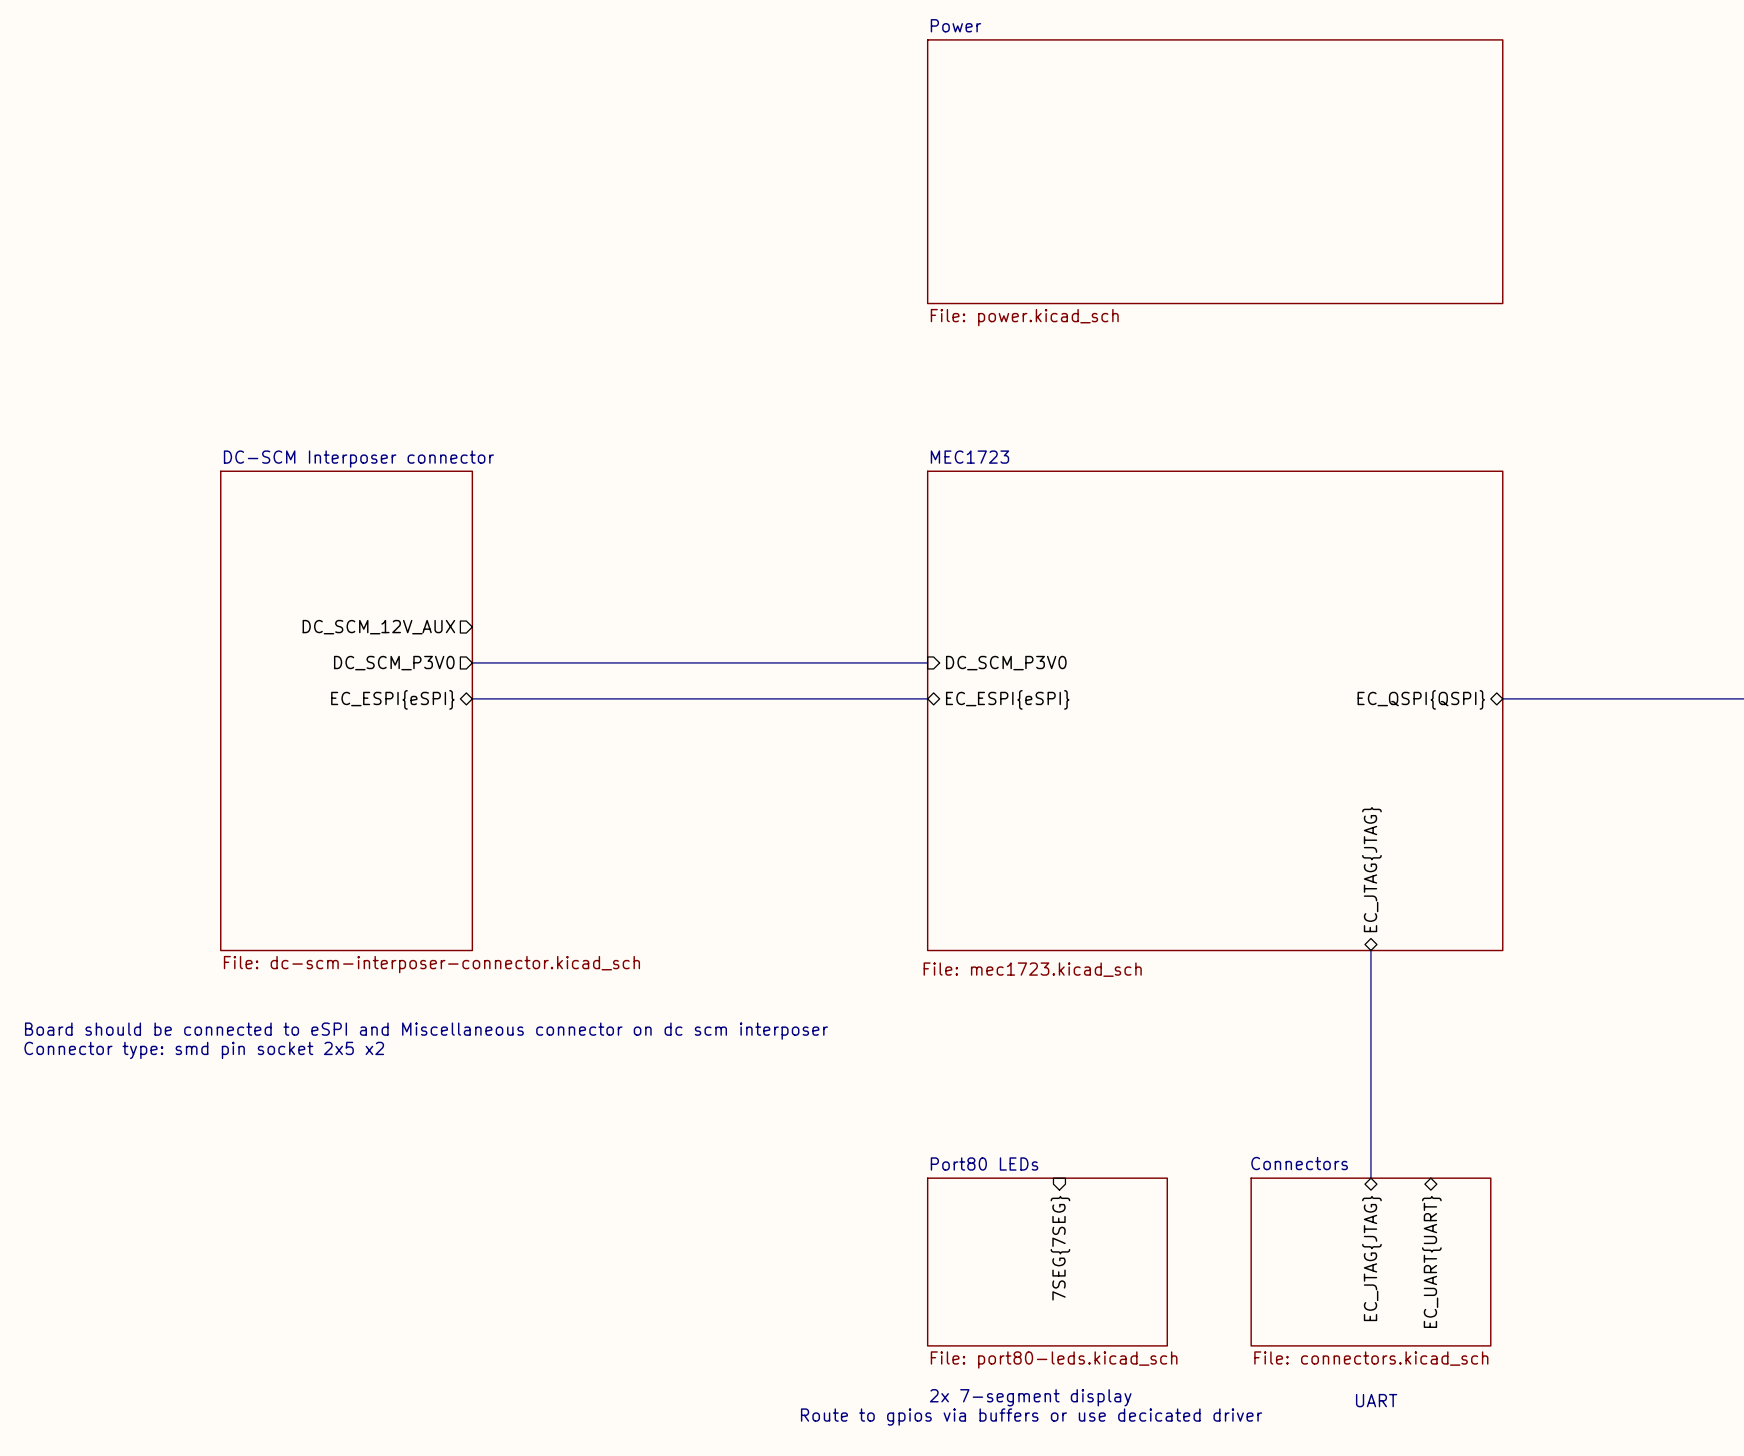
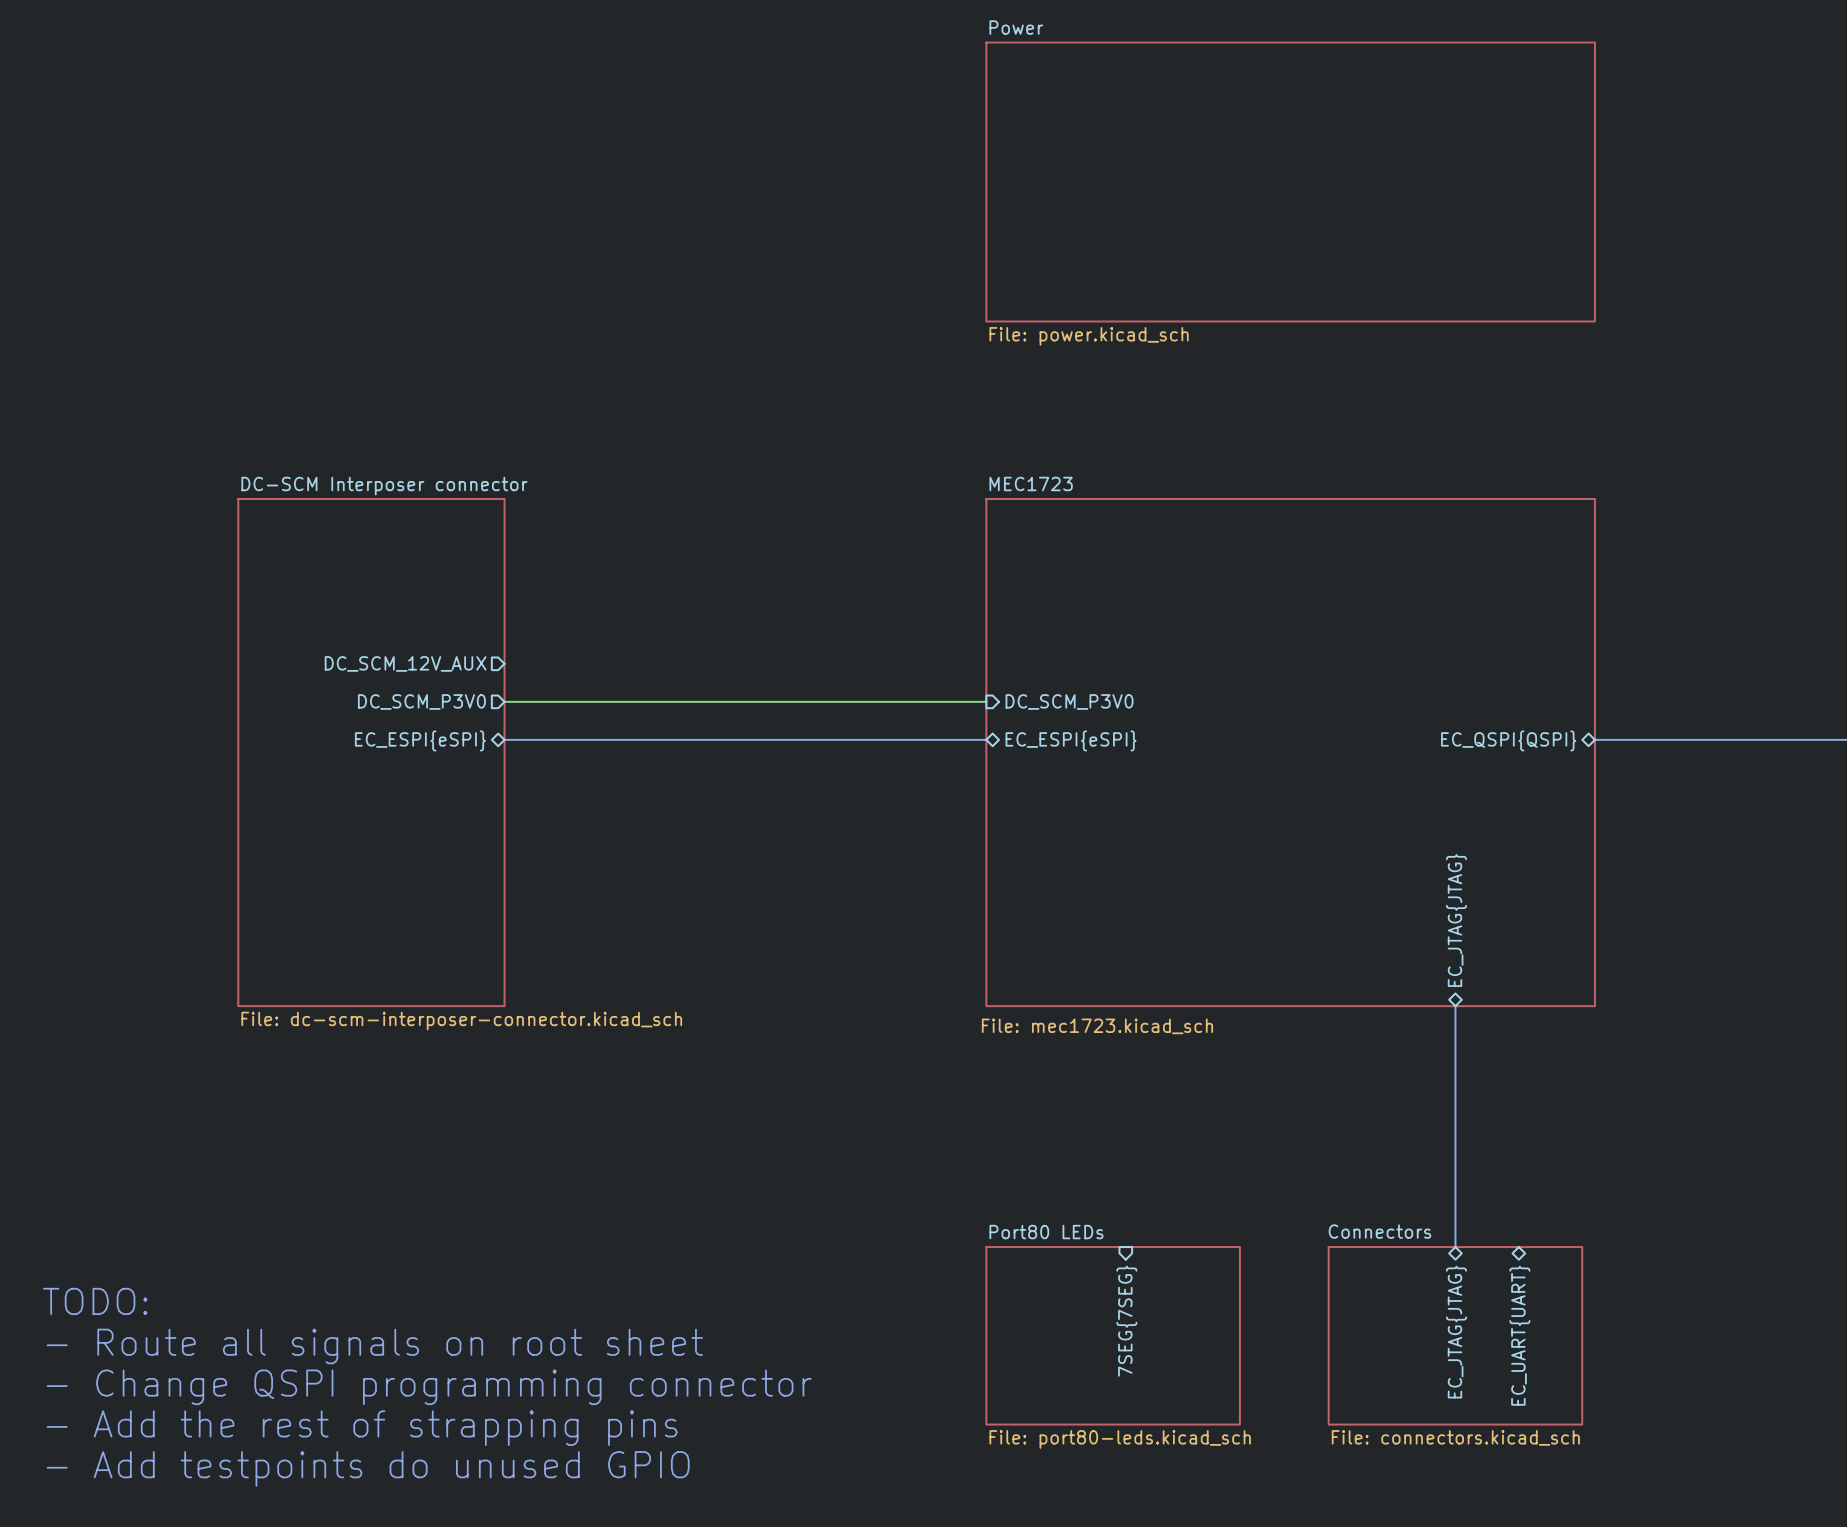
text: Board should be connected to eSPI and Miscellaneous connector on dc scm interposer (426, 1031) -> none
text: Connector type: smd pin socket 2x5 x2 (204, 1050) -> none
text: none -> TODO: (95, 1301)
text: none -> - Route all signals on root sheet (374, 1346)
text: none -> - Change QSPI programming connector (429, 1387)
text: none -> - Add the rest of strapping pins (362, 1428)
text: none -> - Add testpoints do unused GPIO (368, 1468)
text: 2x 7-segment display (1030, 1397) -> none
text: UART (1376, 1400) -> none
text: Route to gpios via buffers or use decicated driver (1031, 1417) -> none

